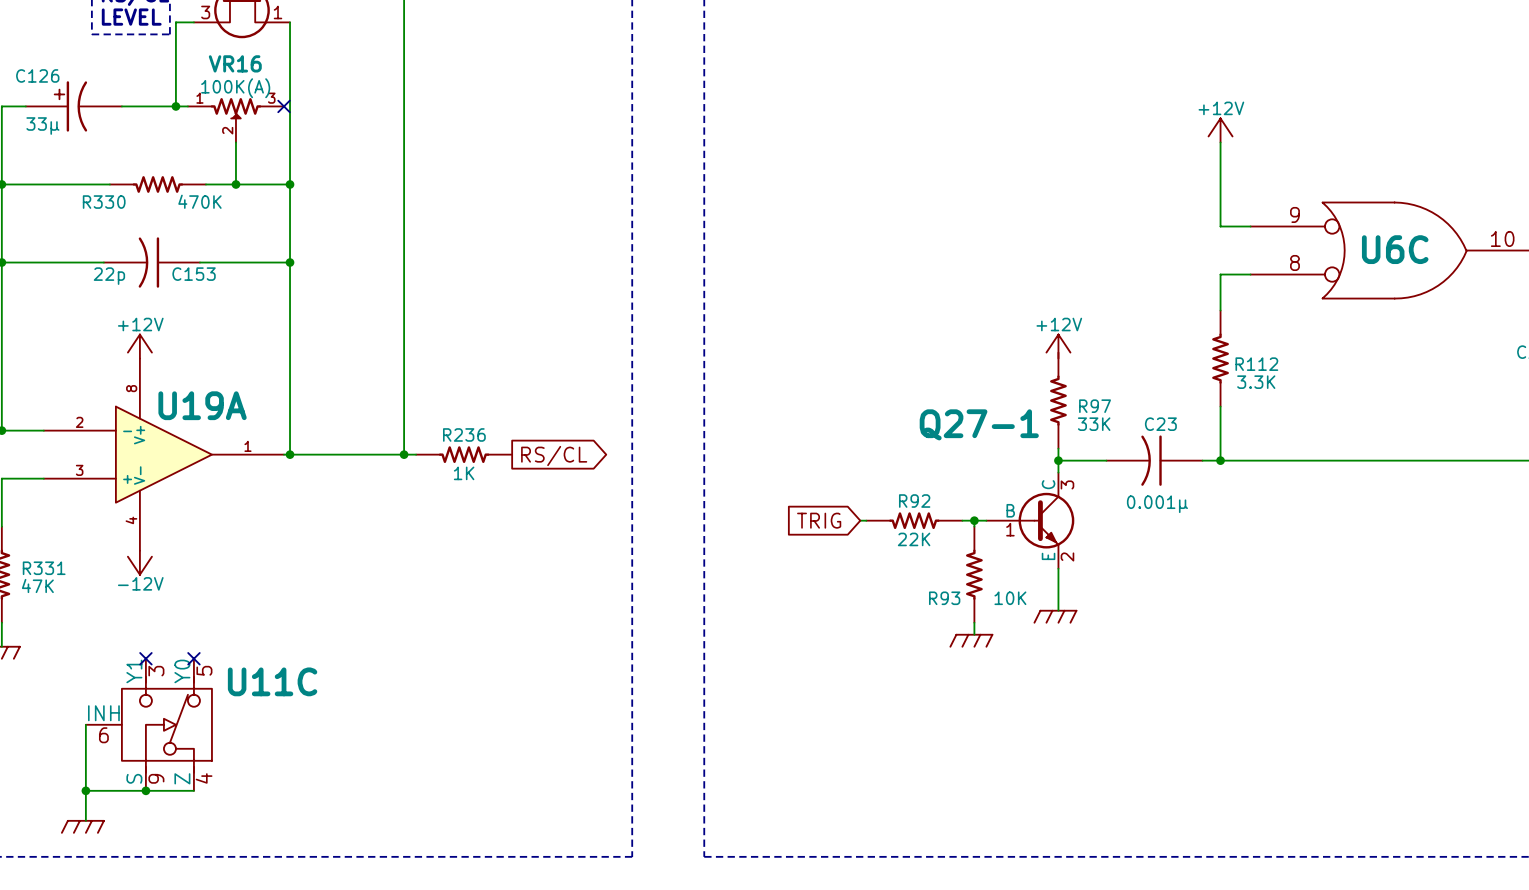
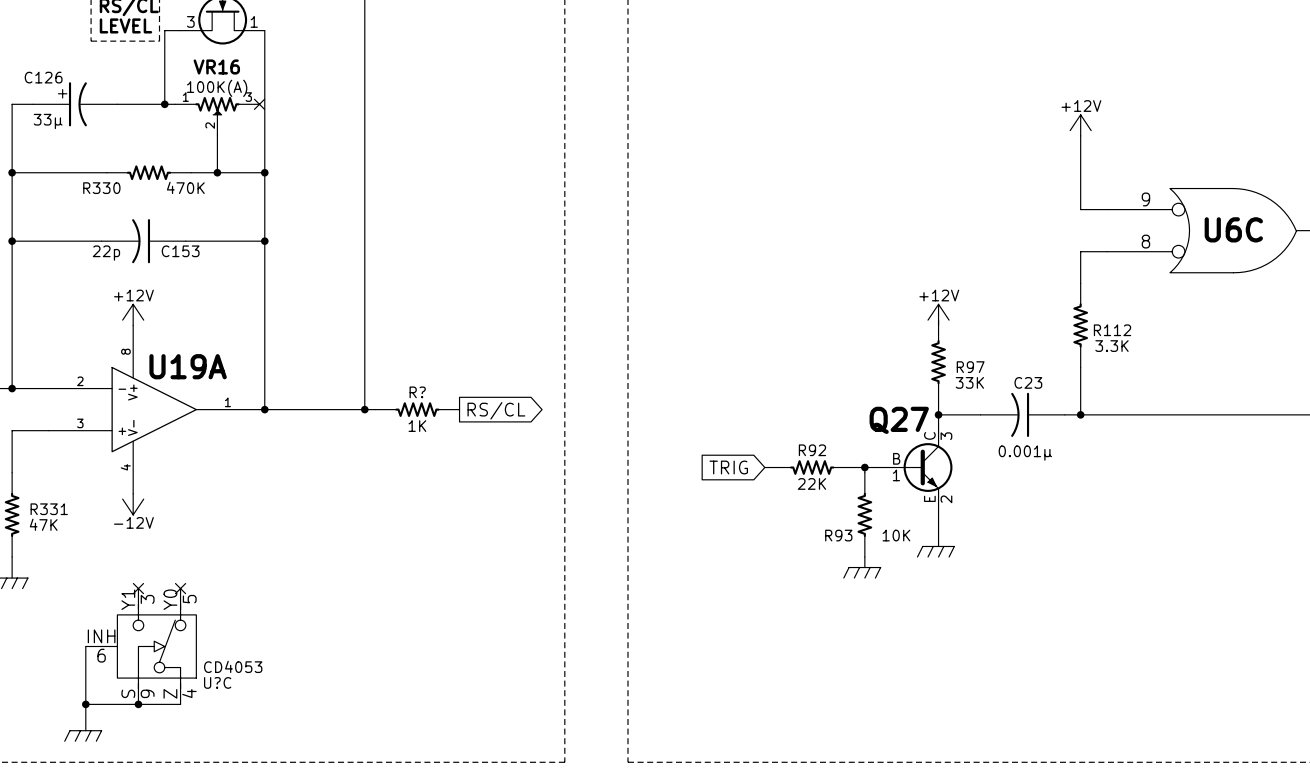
Q27-1 name: Q27-1 (979, 424) -> Q27 (899, 420)
R236 name: R236 (464, 434) -> R? (417, 392)
U11C name: U11C (272, 681) -> U?C (217, 682)
U11C value: none -> CD4053 (233, 666)

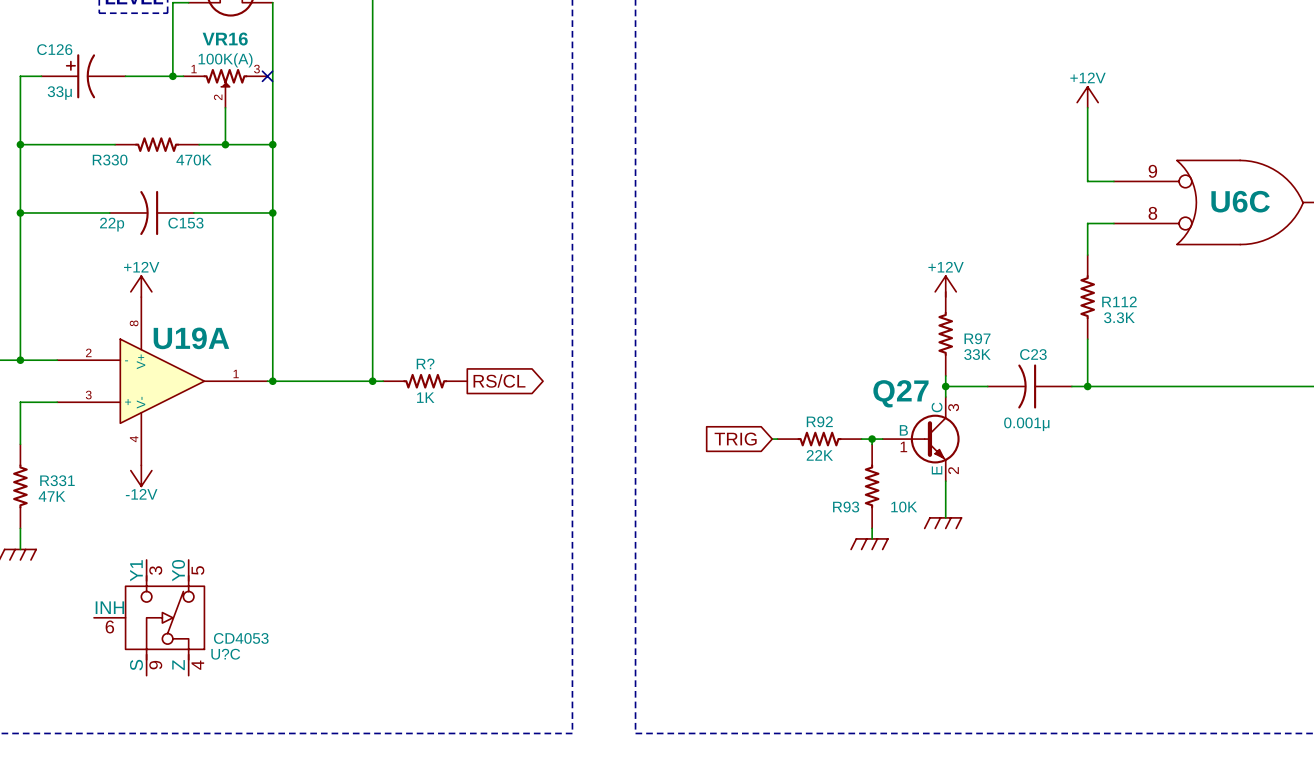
no-connect mark: (138, 588) -> none
no-connect mark: (180, 588) -> none
wire: (85, 646) (85, 730) -> none
wire: (85, 704) (180, 704) -> none
junction: (85, 704) -> none
junction: (138, 704) -> none
power symbol: (83, 735) -> none

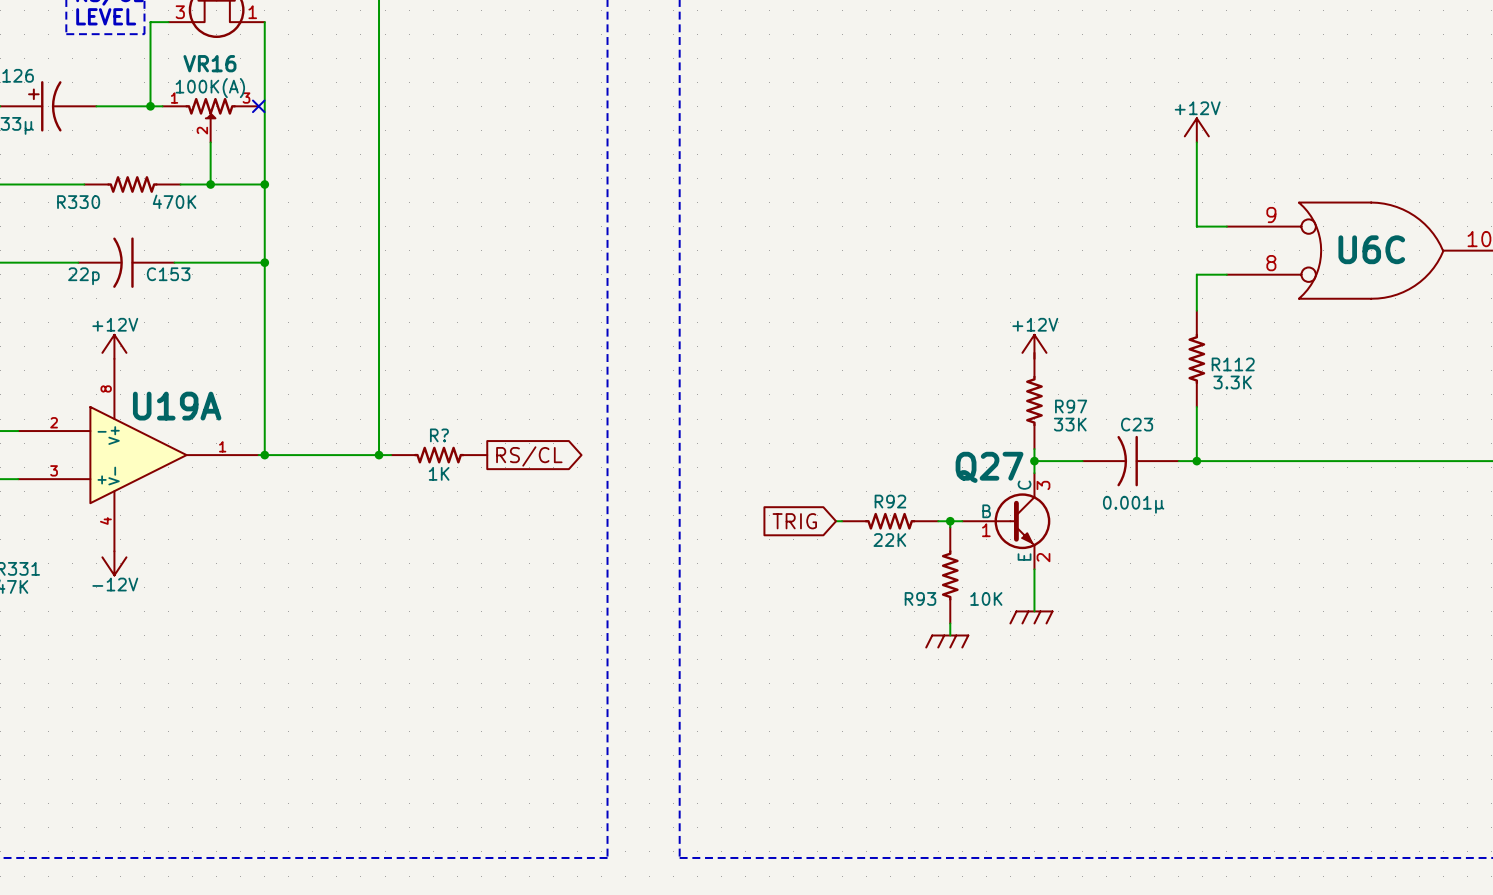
U?C: CD4053 (149, 617) -> none

